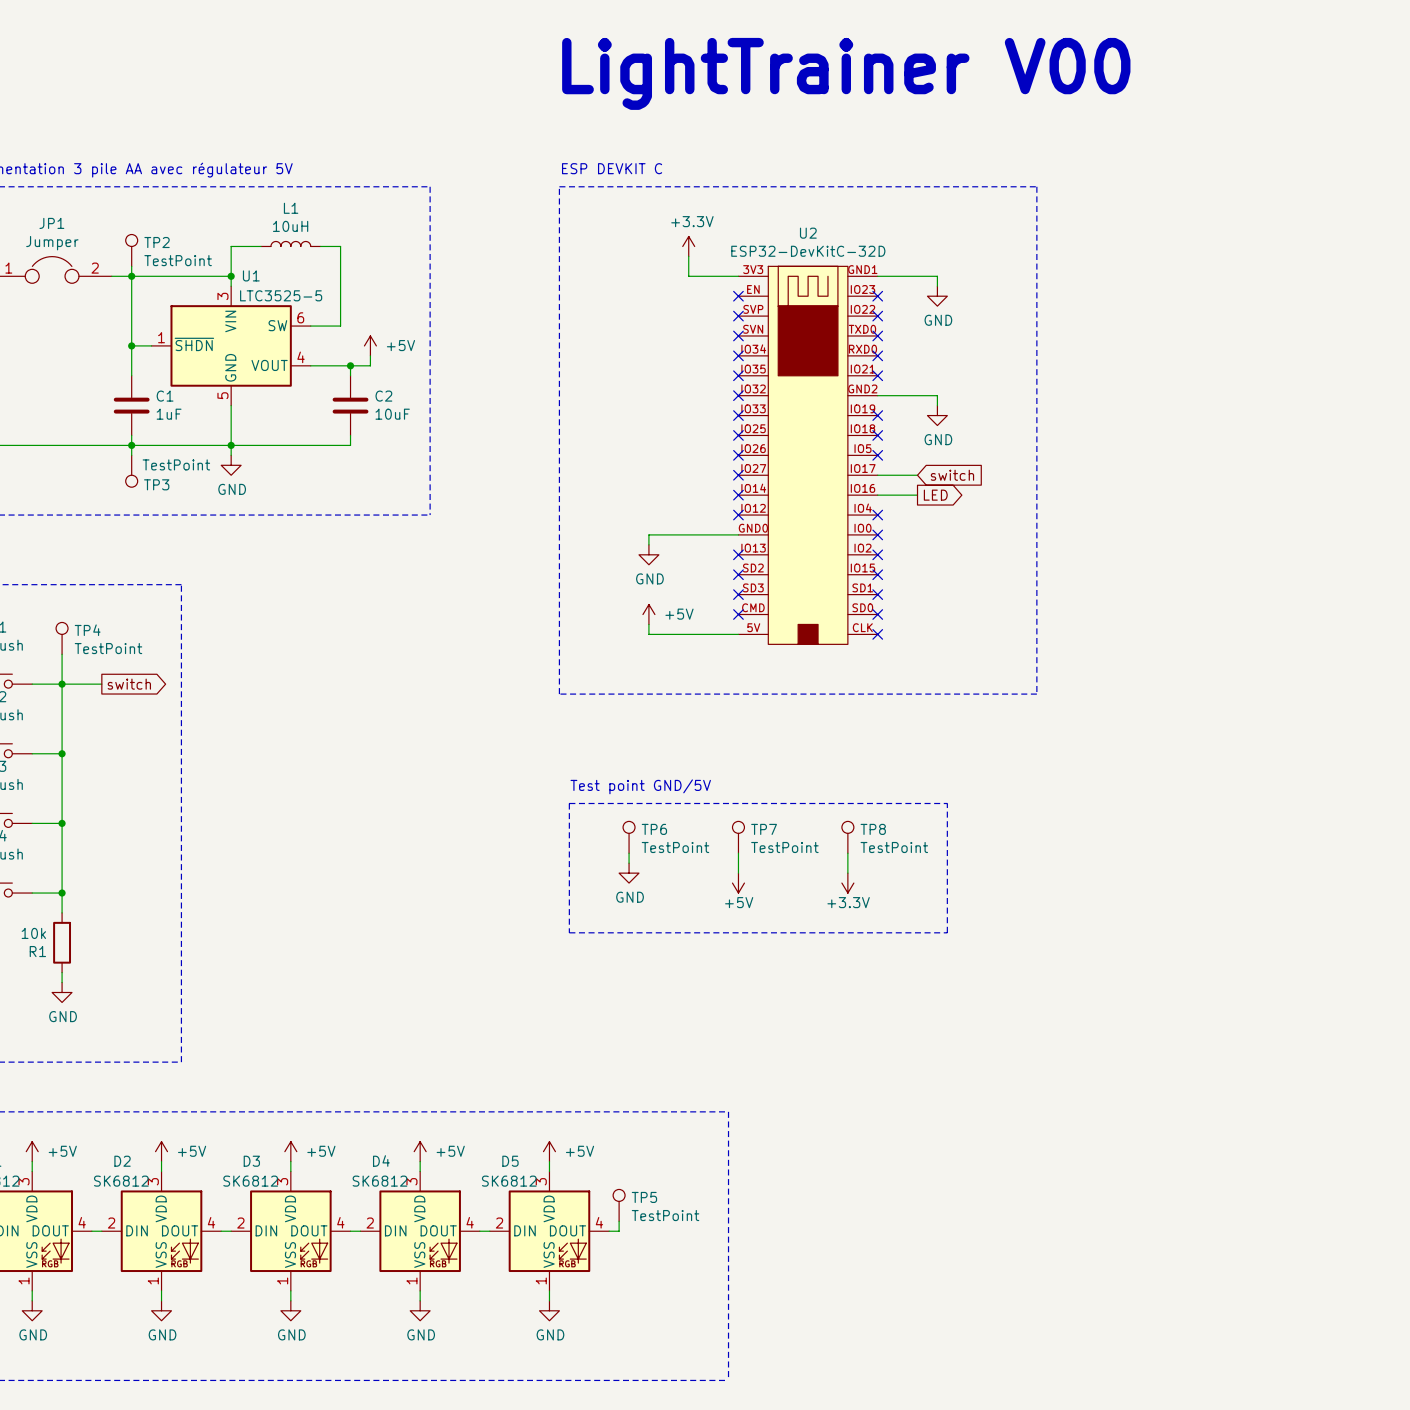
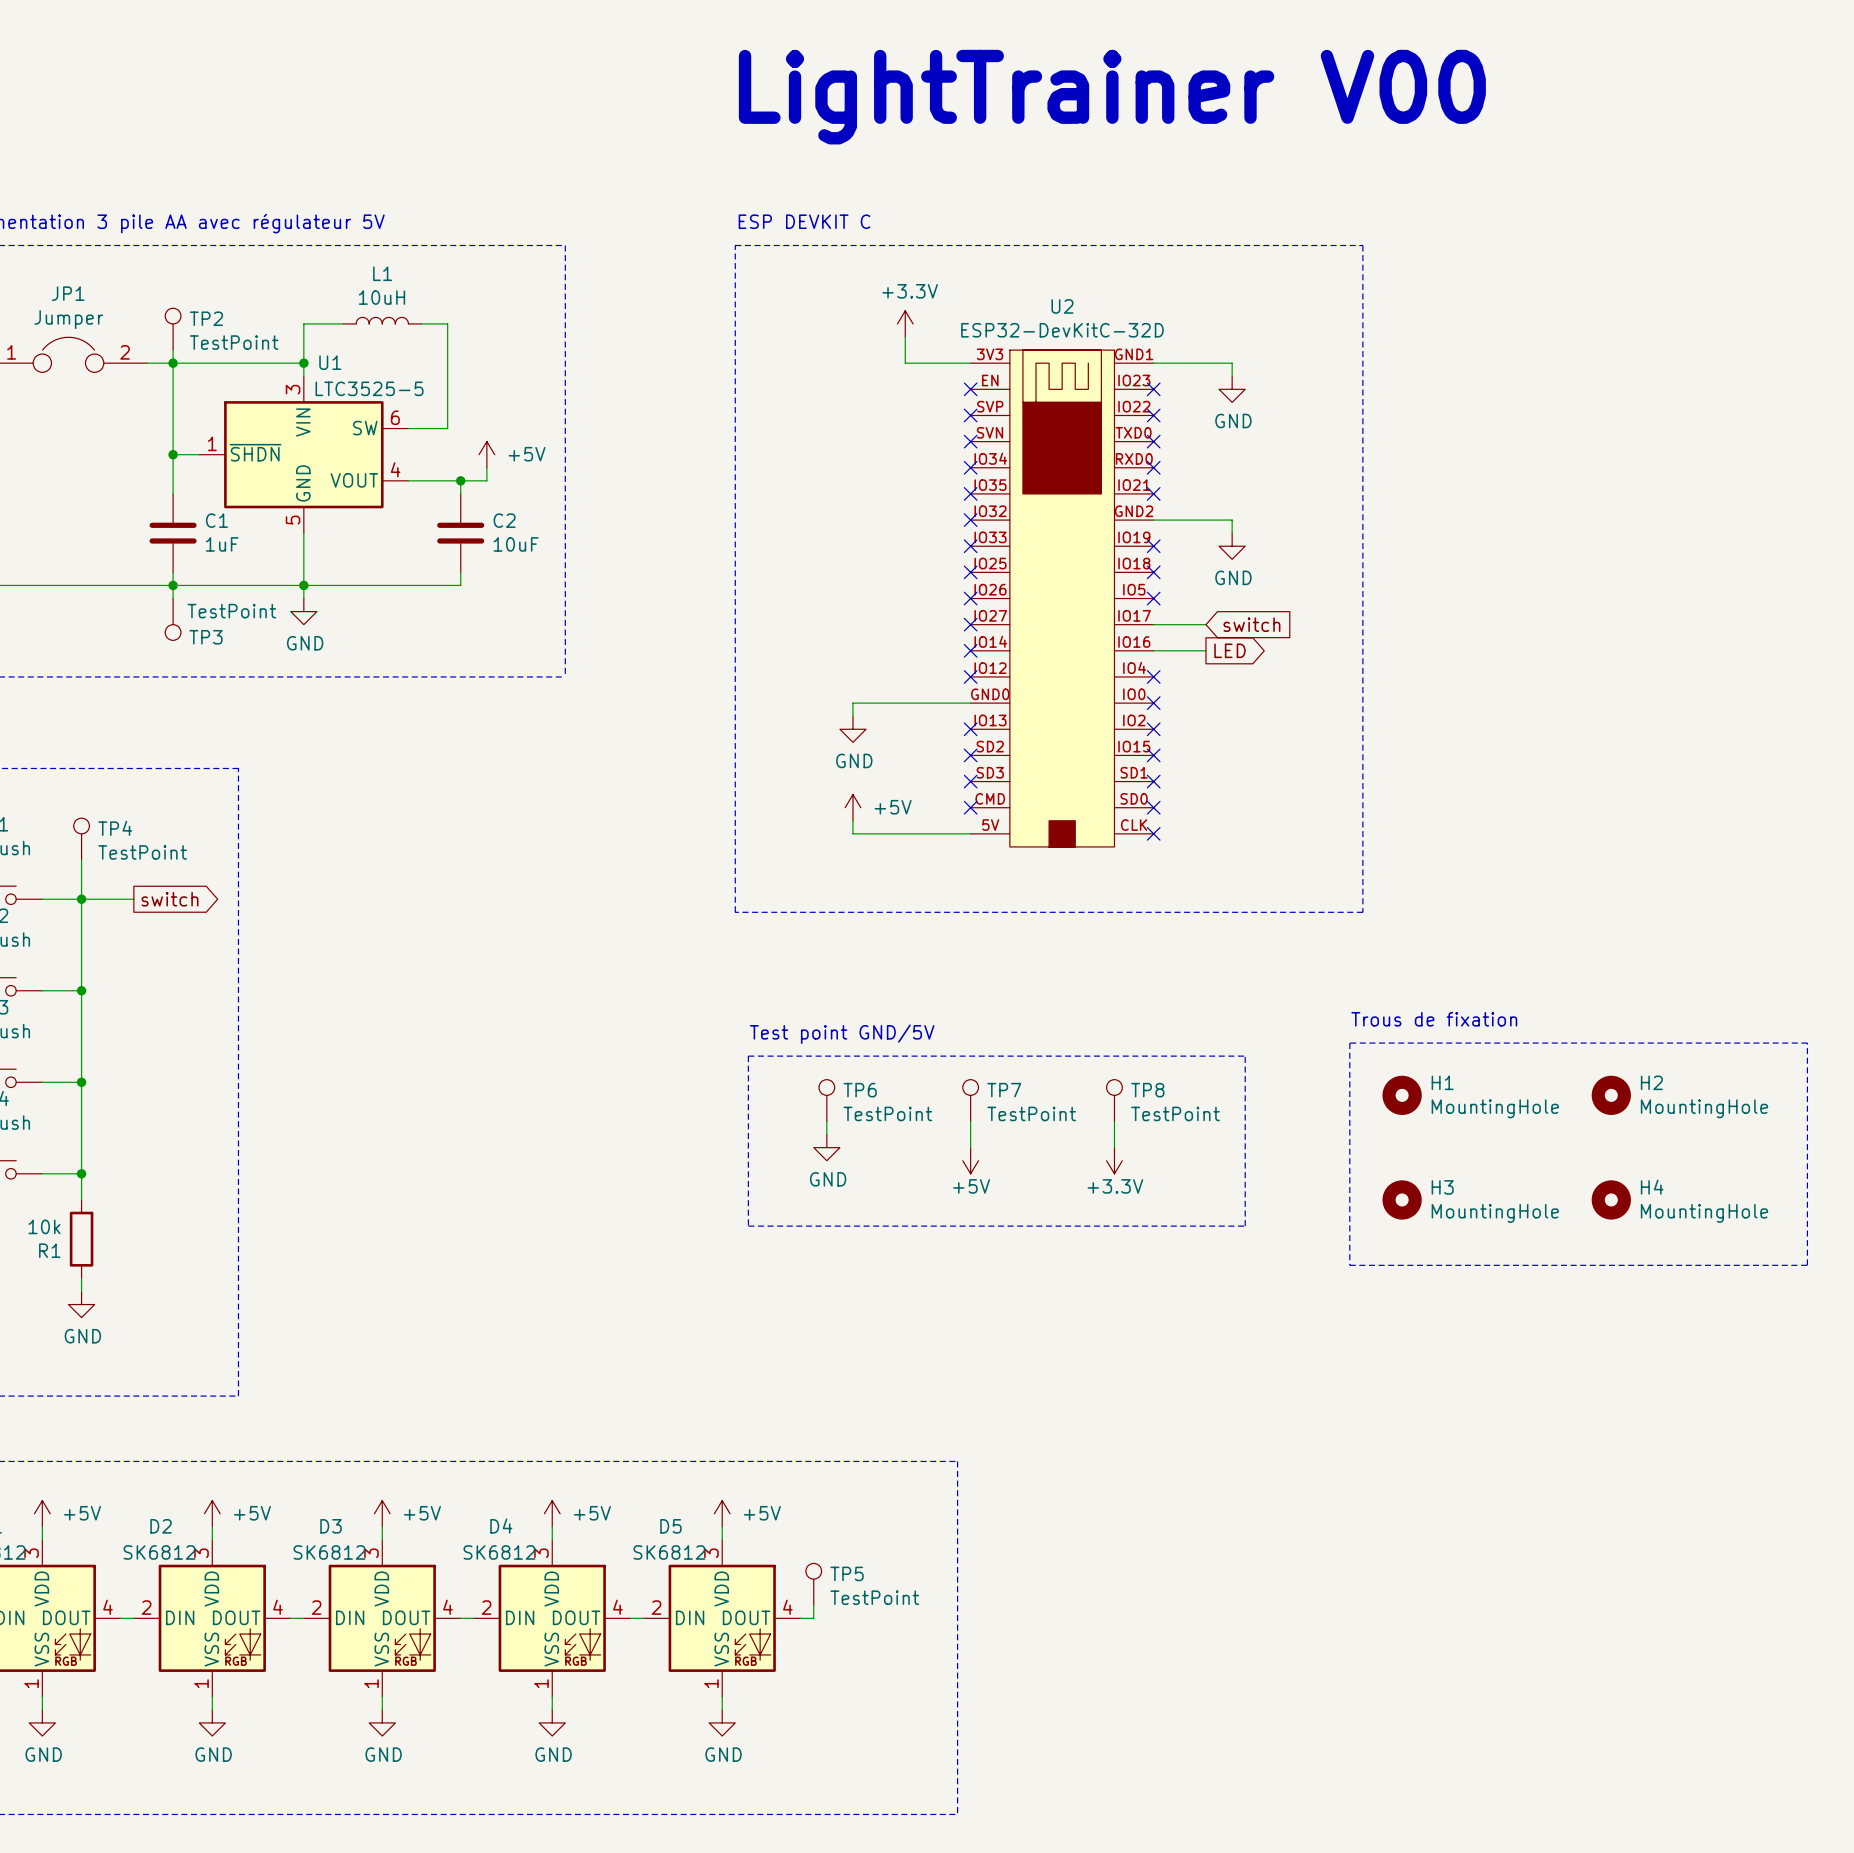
text: none -> Trous de fixation (1434, 1019)
line: none -> (1349, 1043) (1807, 1043) (1807, 1265) (1349, 1265) (1349, 1043)
H1: none -> MountingHole (1402, 1095)
H2: none -> MountingHole (1611, 1095)
H3: none -> MountingHole (1402, 1199)
H4: none -> MountingHole (1611, 1199)

